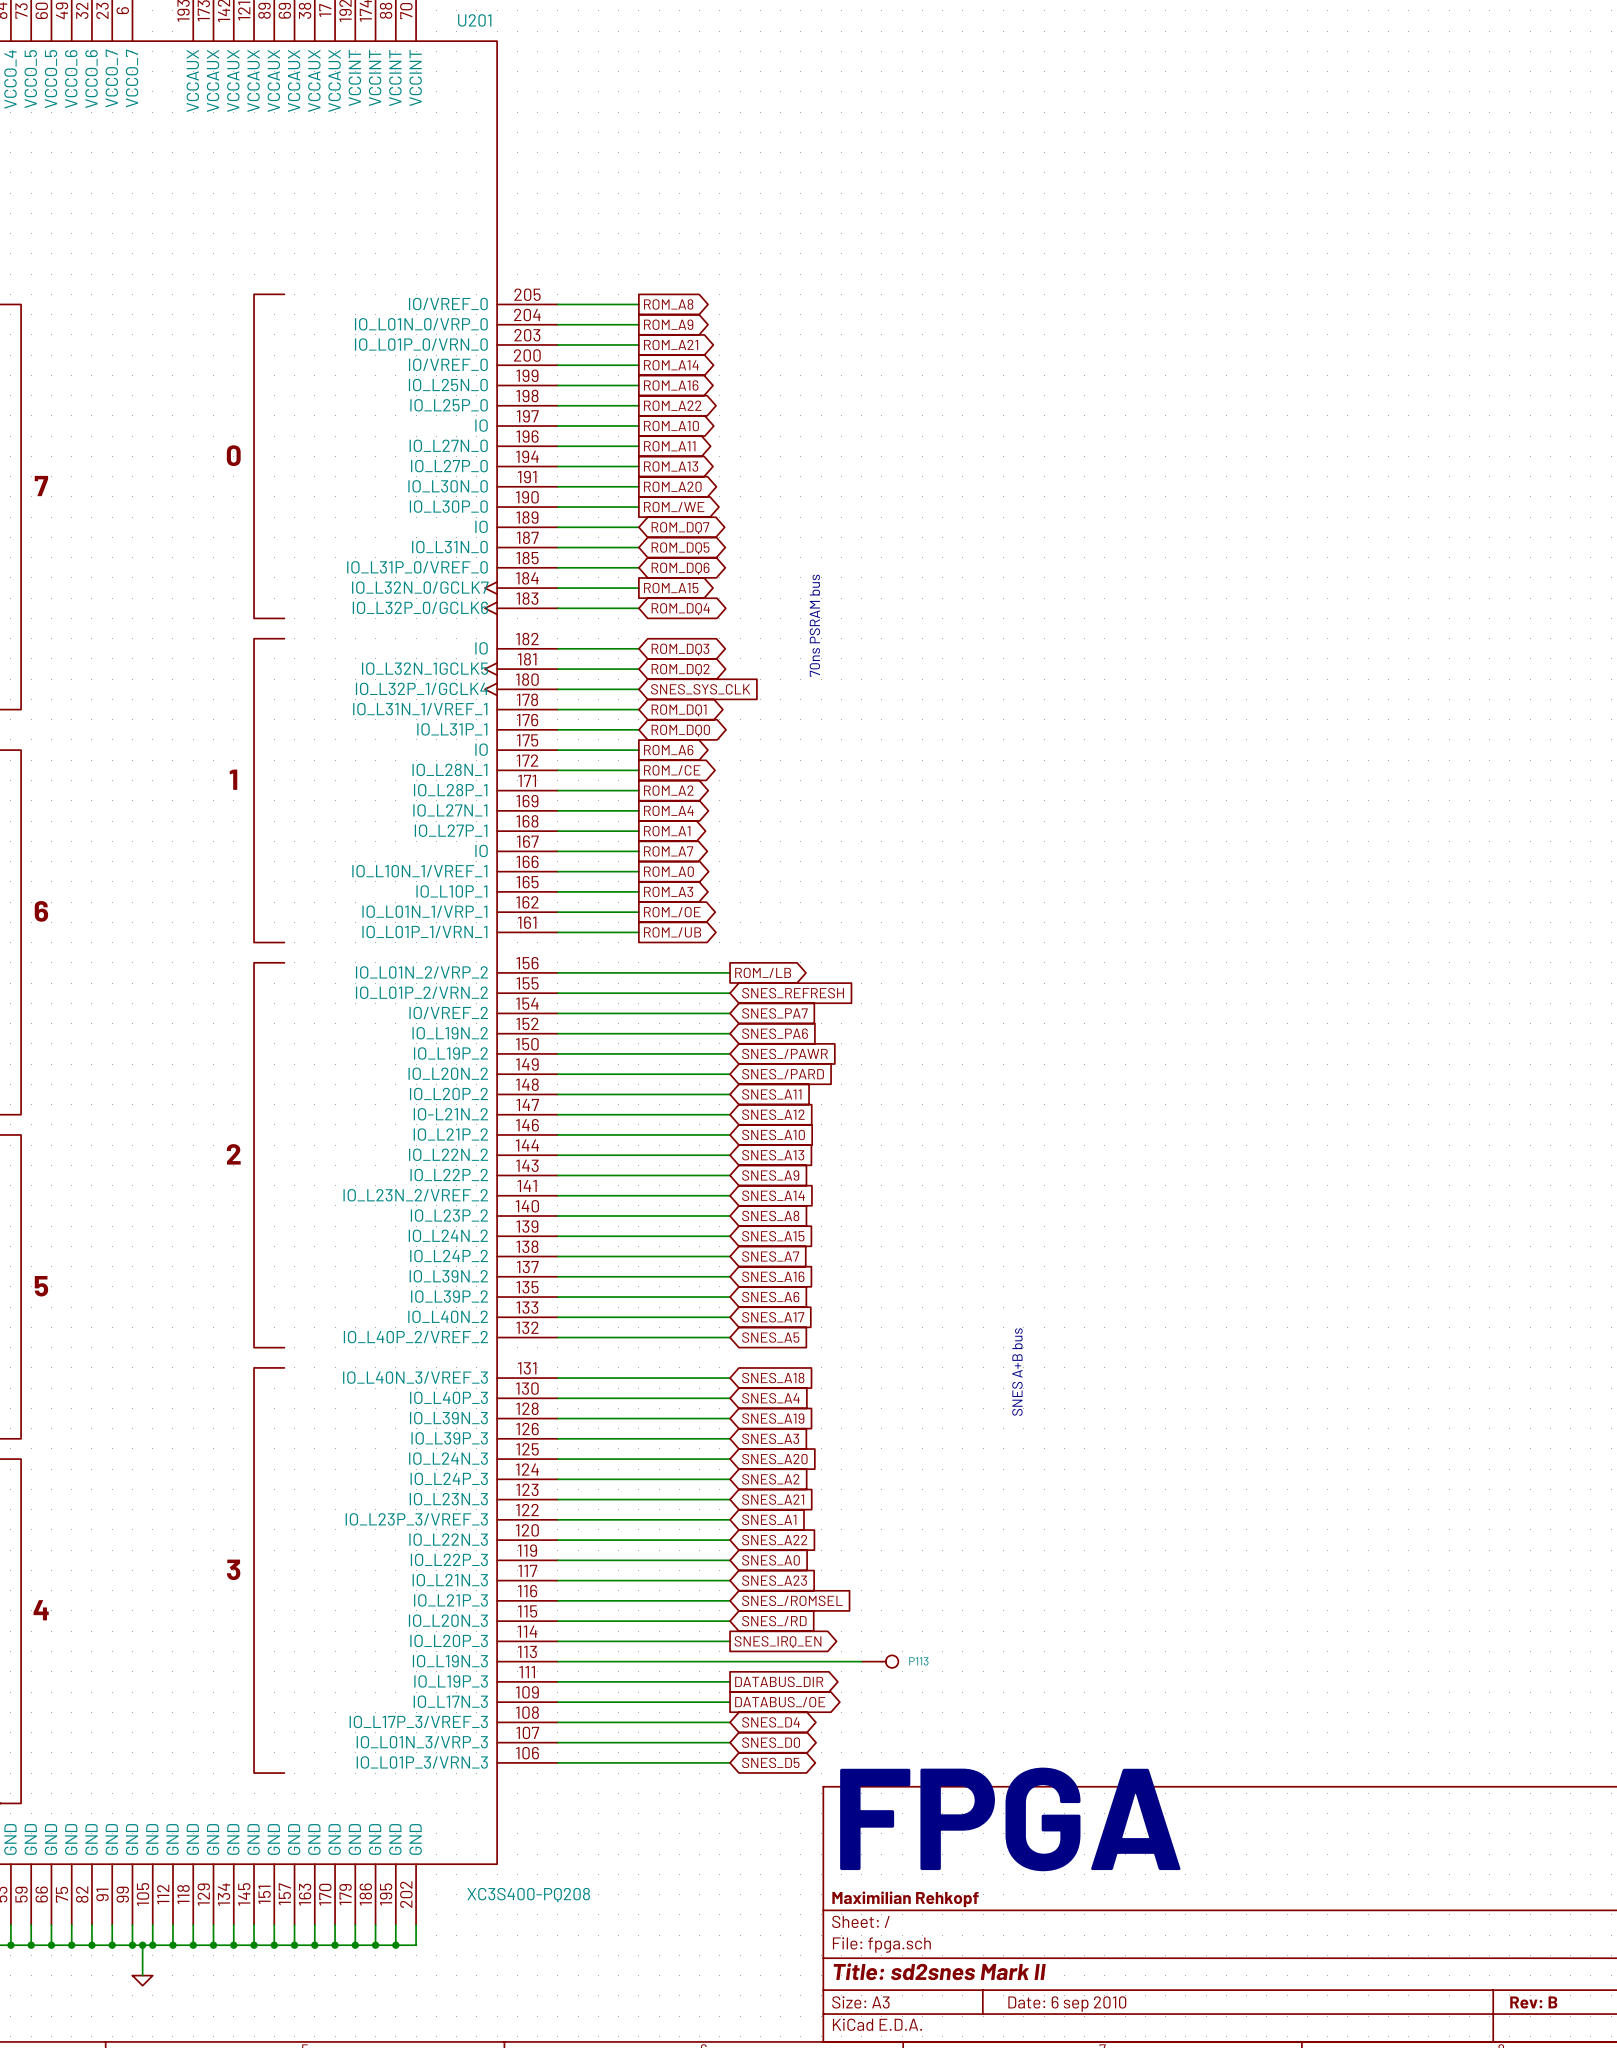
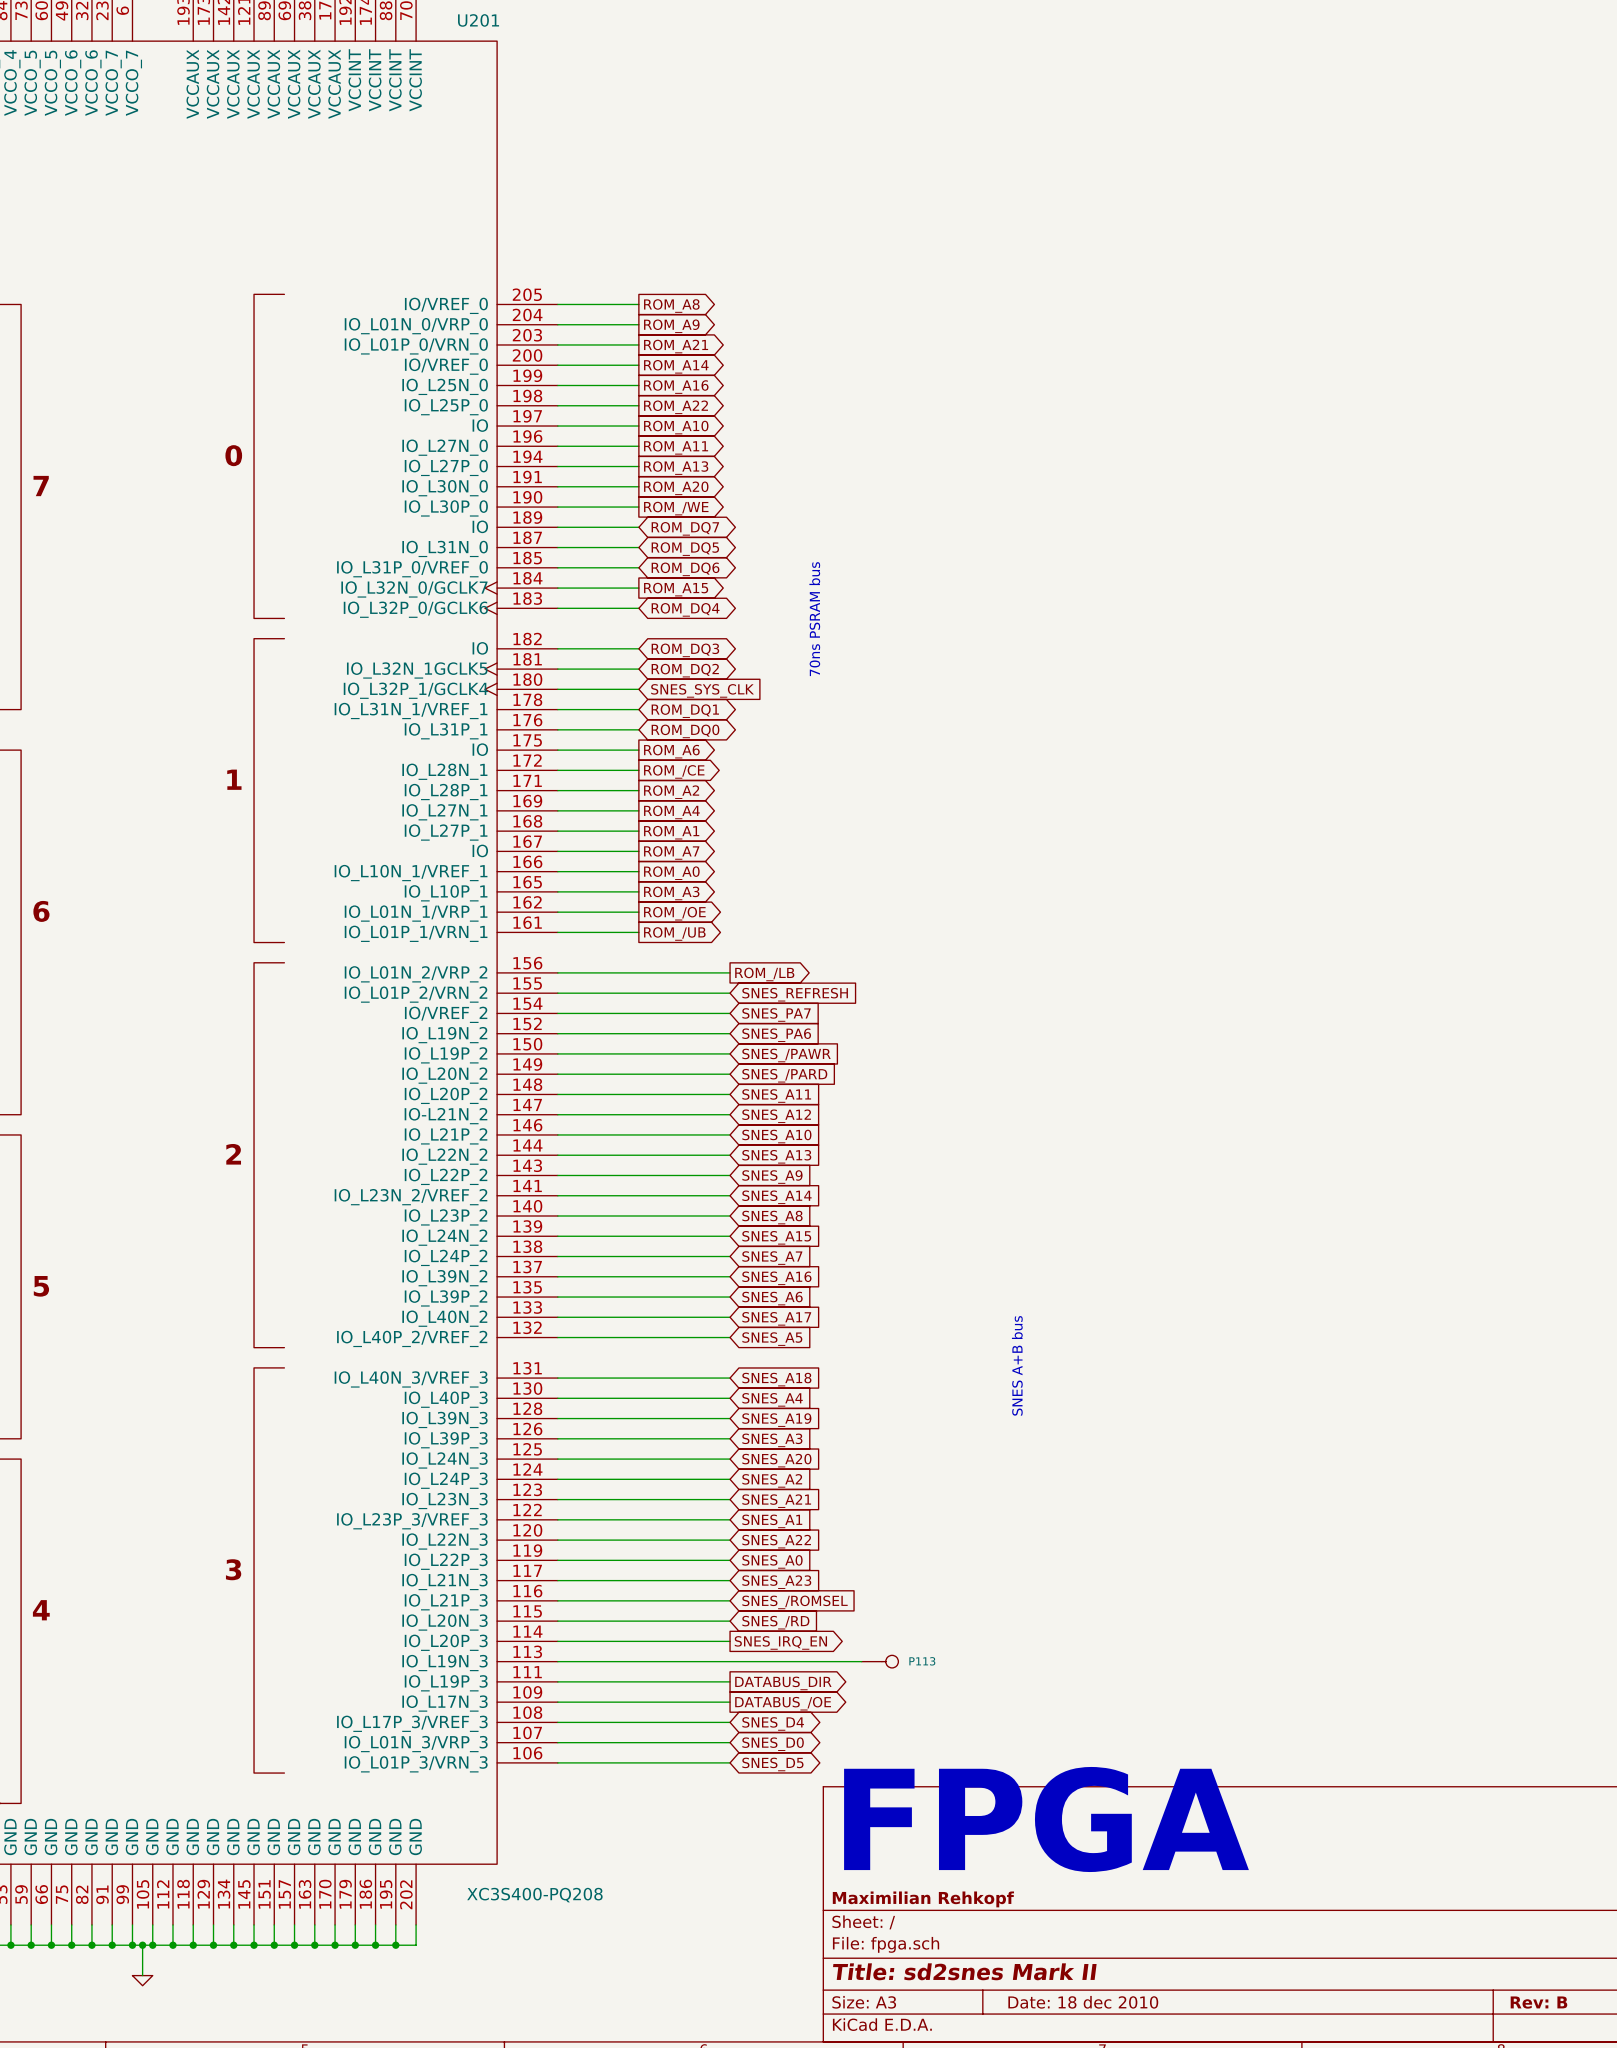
title block: Date: 6 sep 2010 (1067, 2004) -> Date: 18 dec 2010 (1083, 2002)

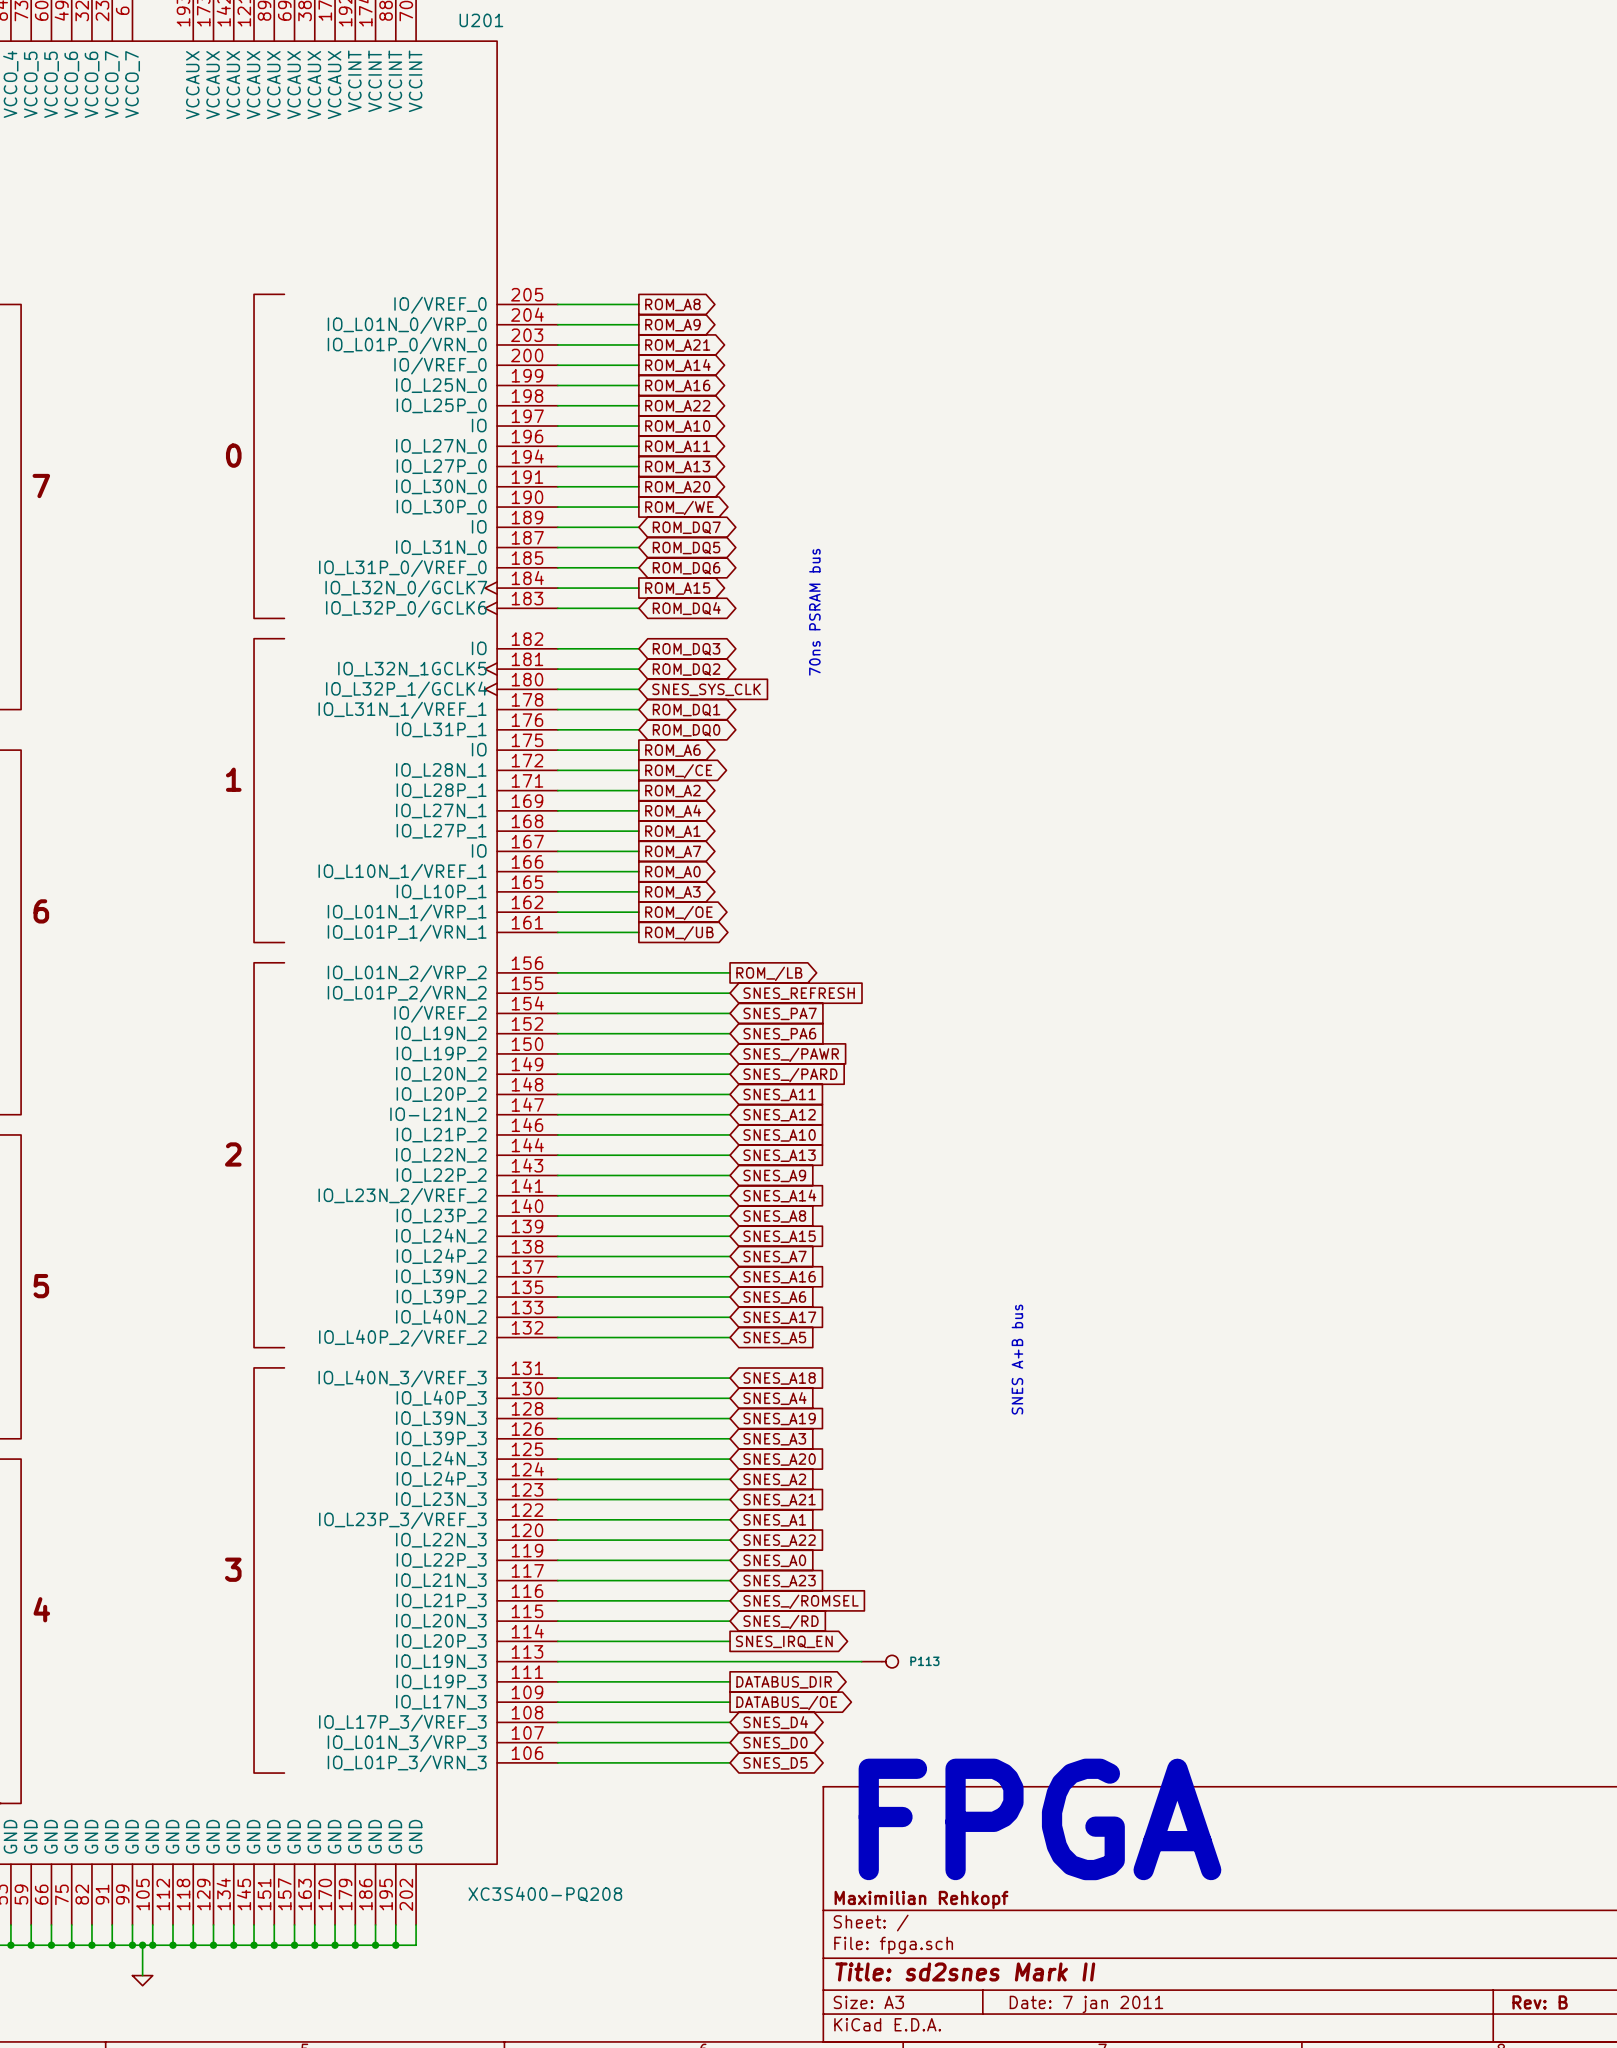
title block: Date: 18 dec 2010 (1083, 2002) -> Date: 7 jan 2011 (1086, 2004)

